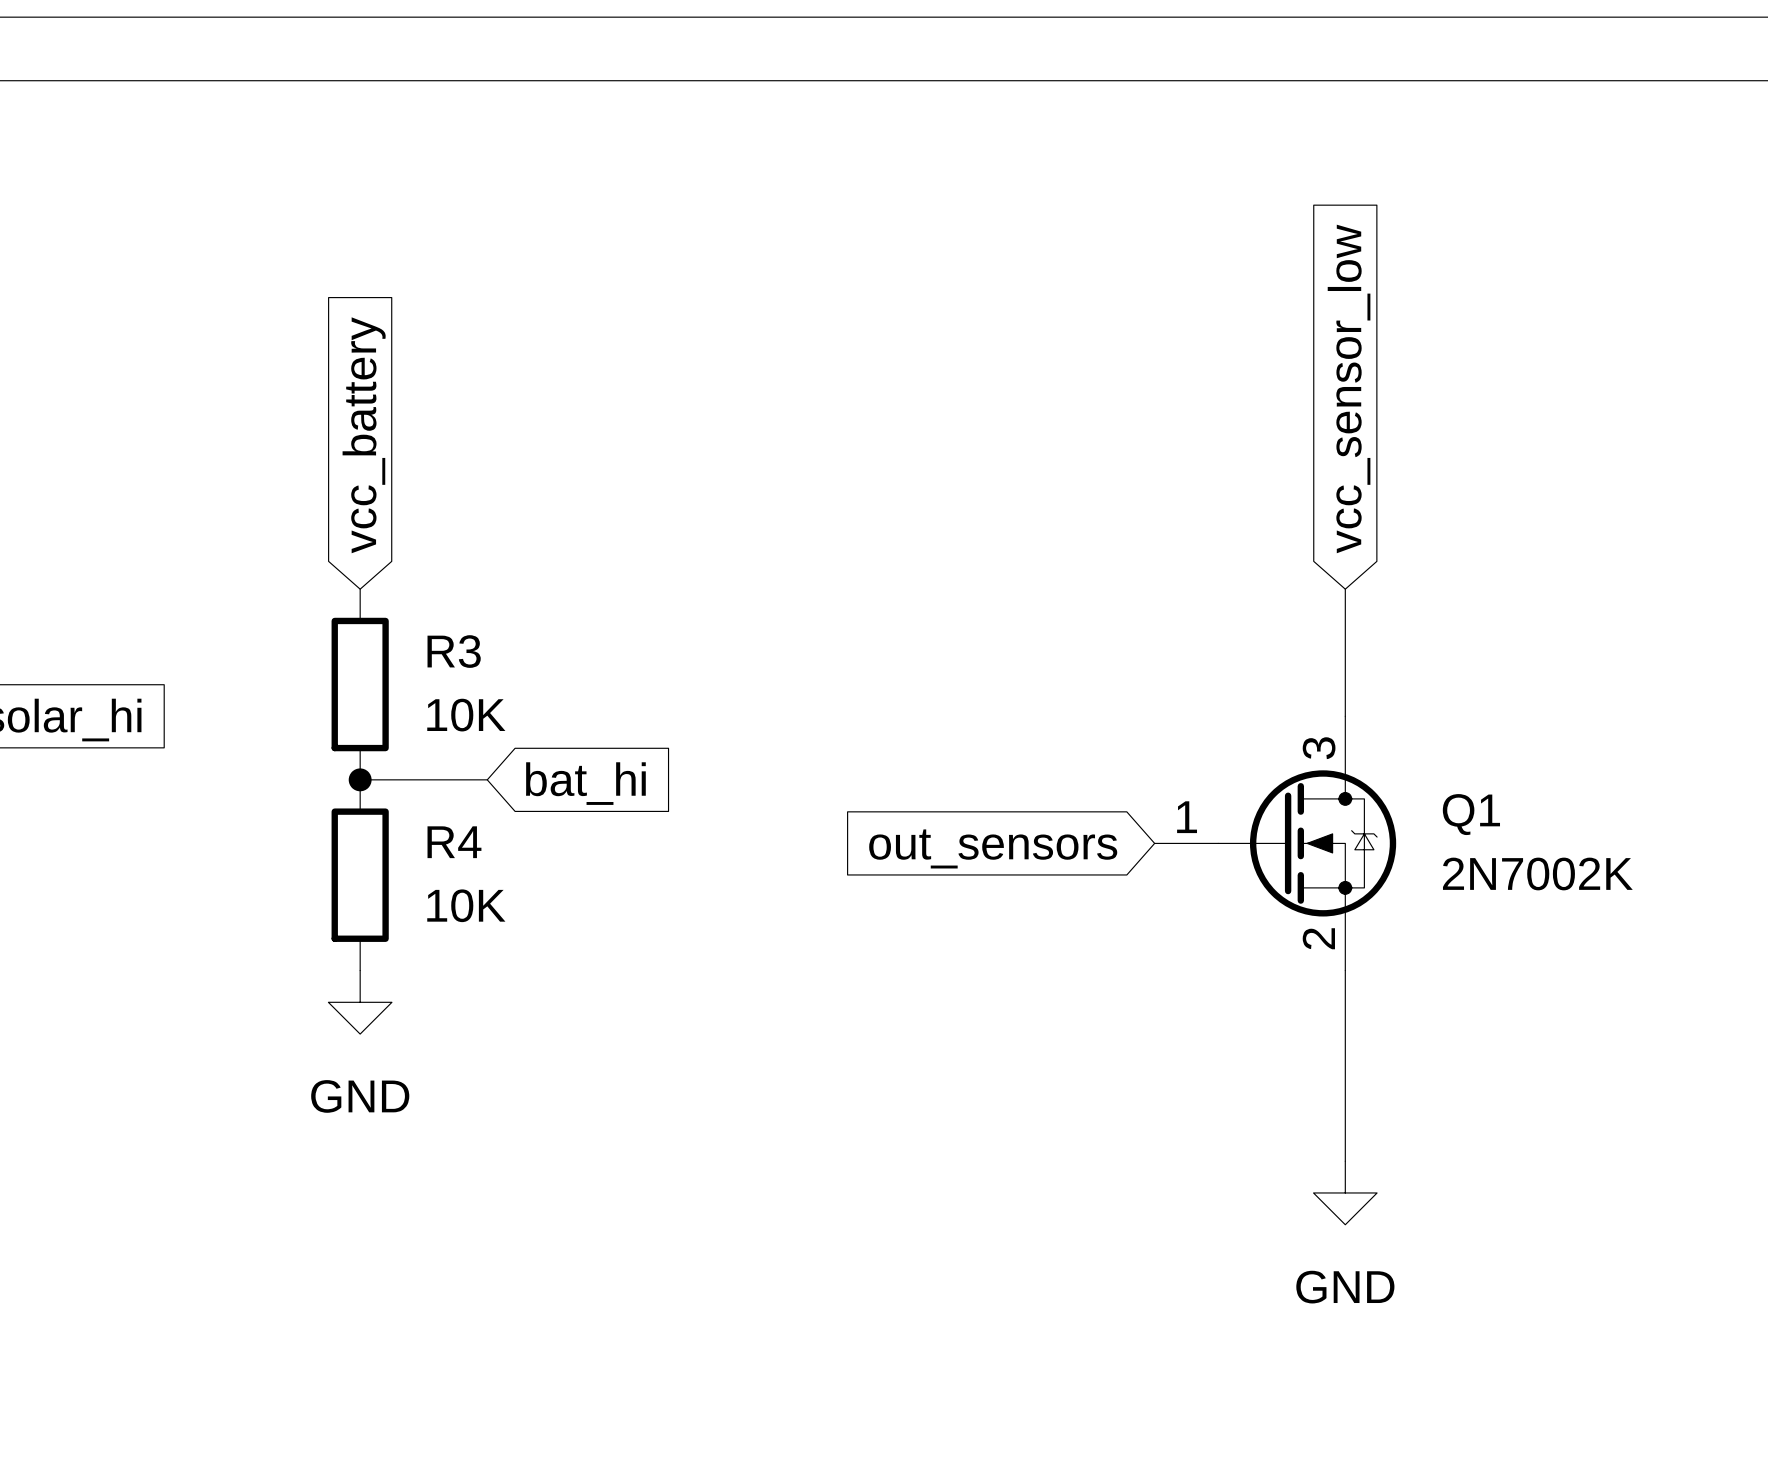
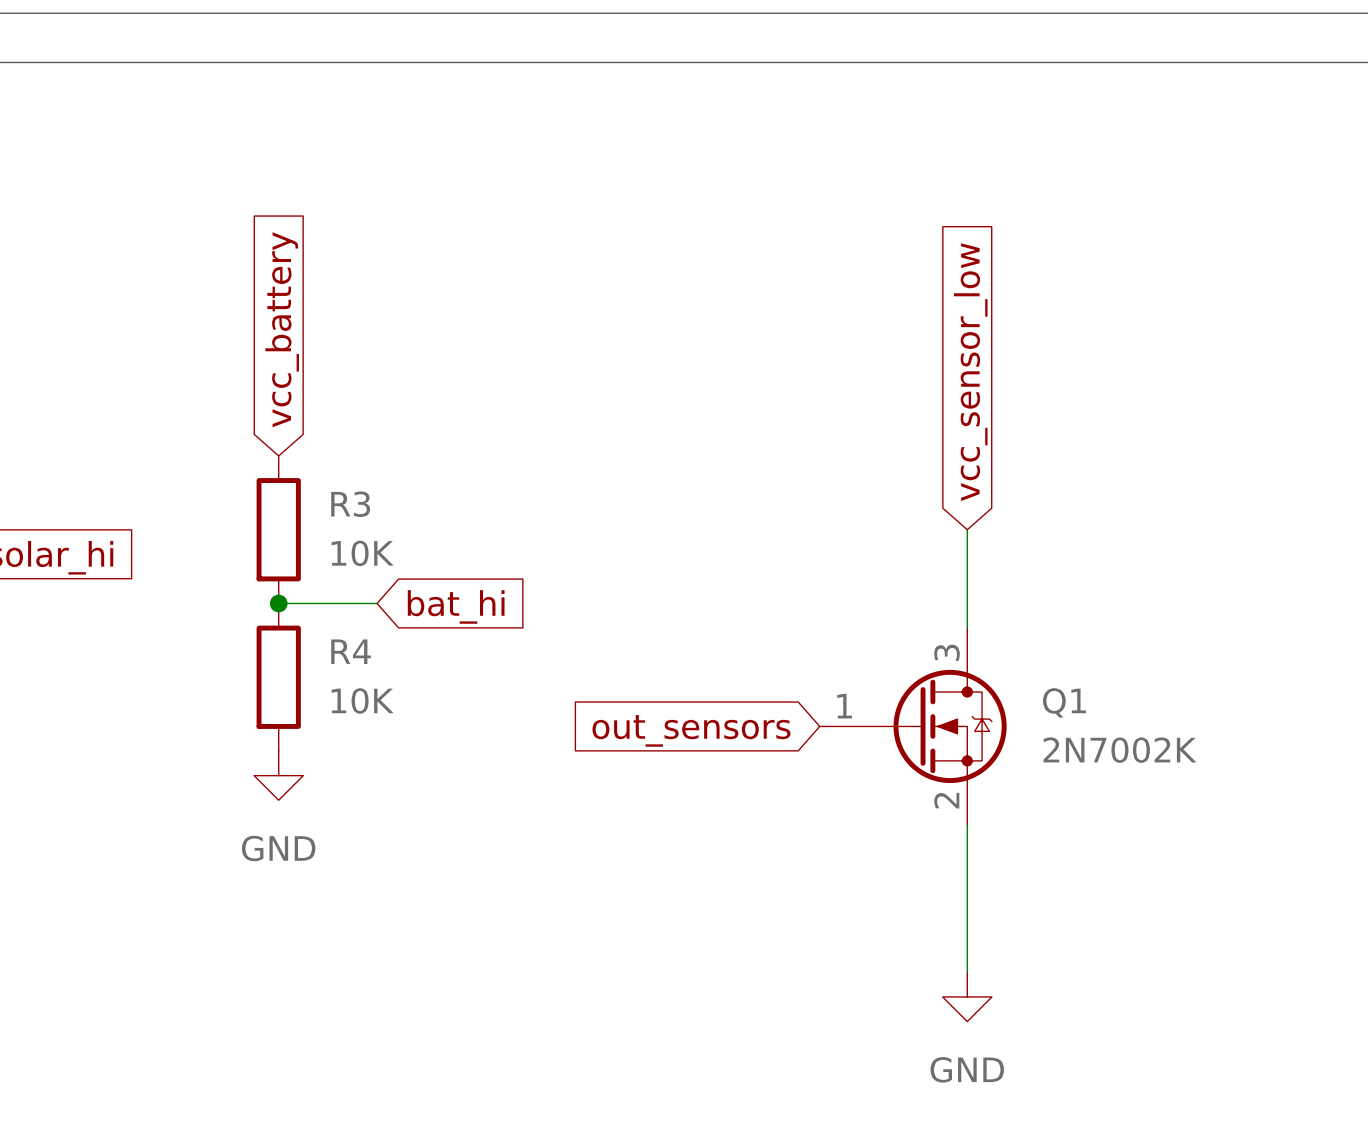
global label position: vcc_sensor_low (1349, 388) -> vcc_sensor_low (970, 372)
wire: (1345, 589) (1345, 716) -> (967, 529) (967, 628)
Q1 position: (1275, 843) -> (913, 726)
global label position: out_sensors (993, 848) -> out_sensors (691, 730)
wire: (1345, 970) (1345, 1161) -> (967, 824) (967, 972)
power symbol position: GND (1345, 1192) -> GND (967, 996)

